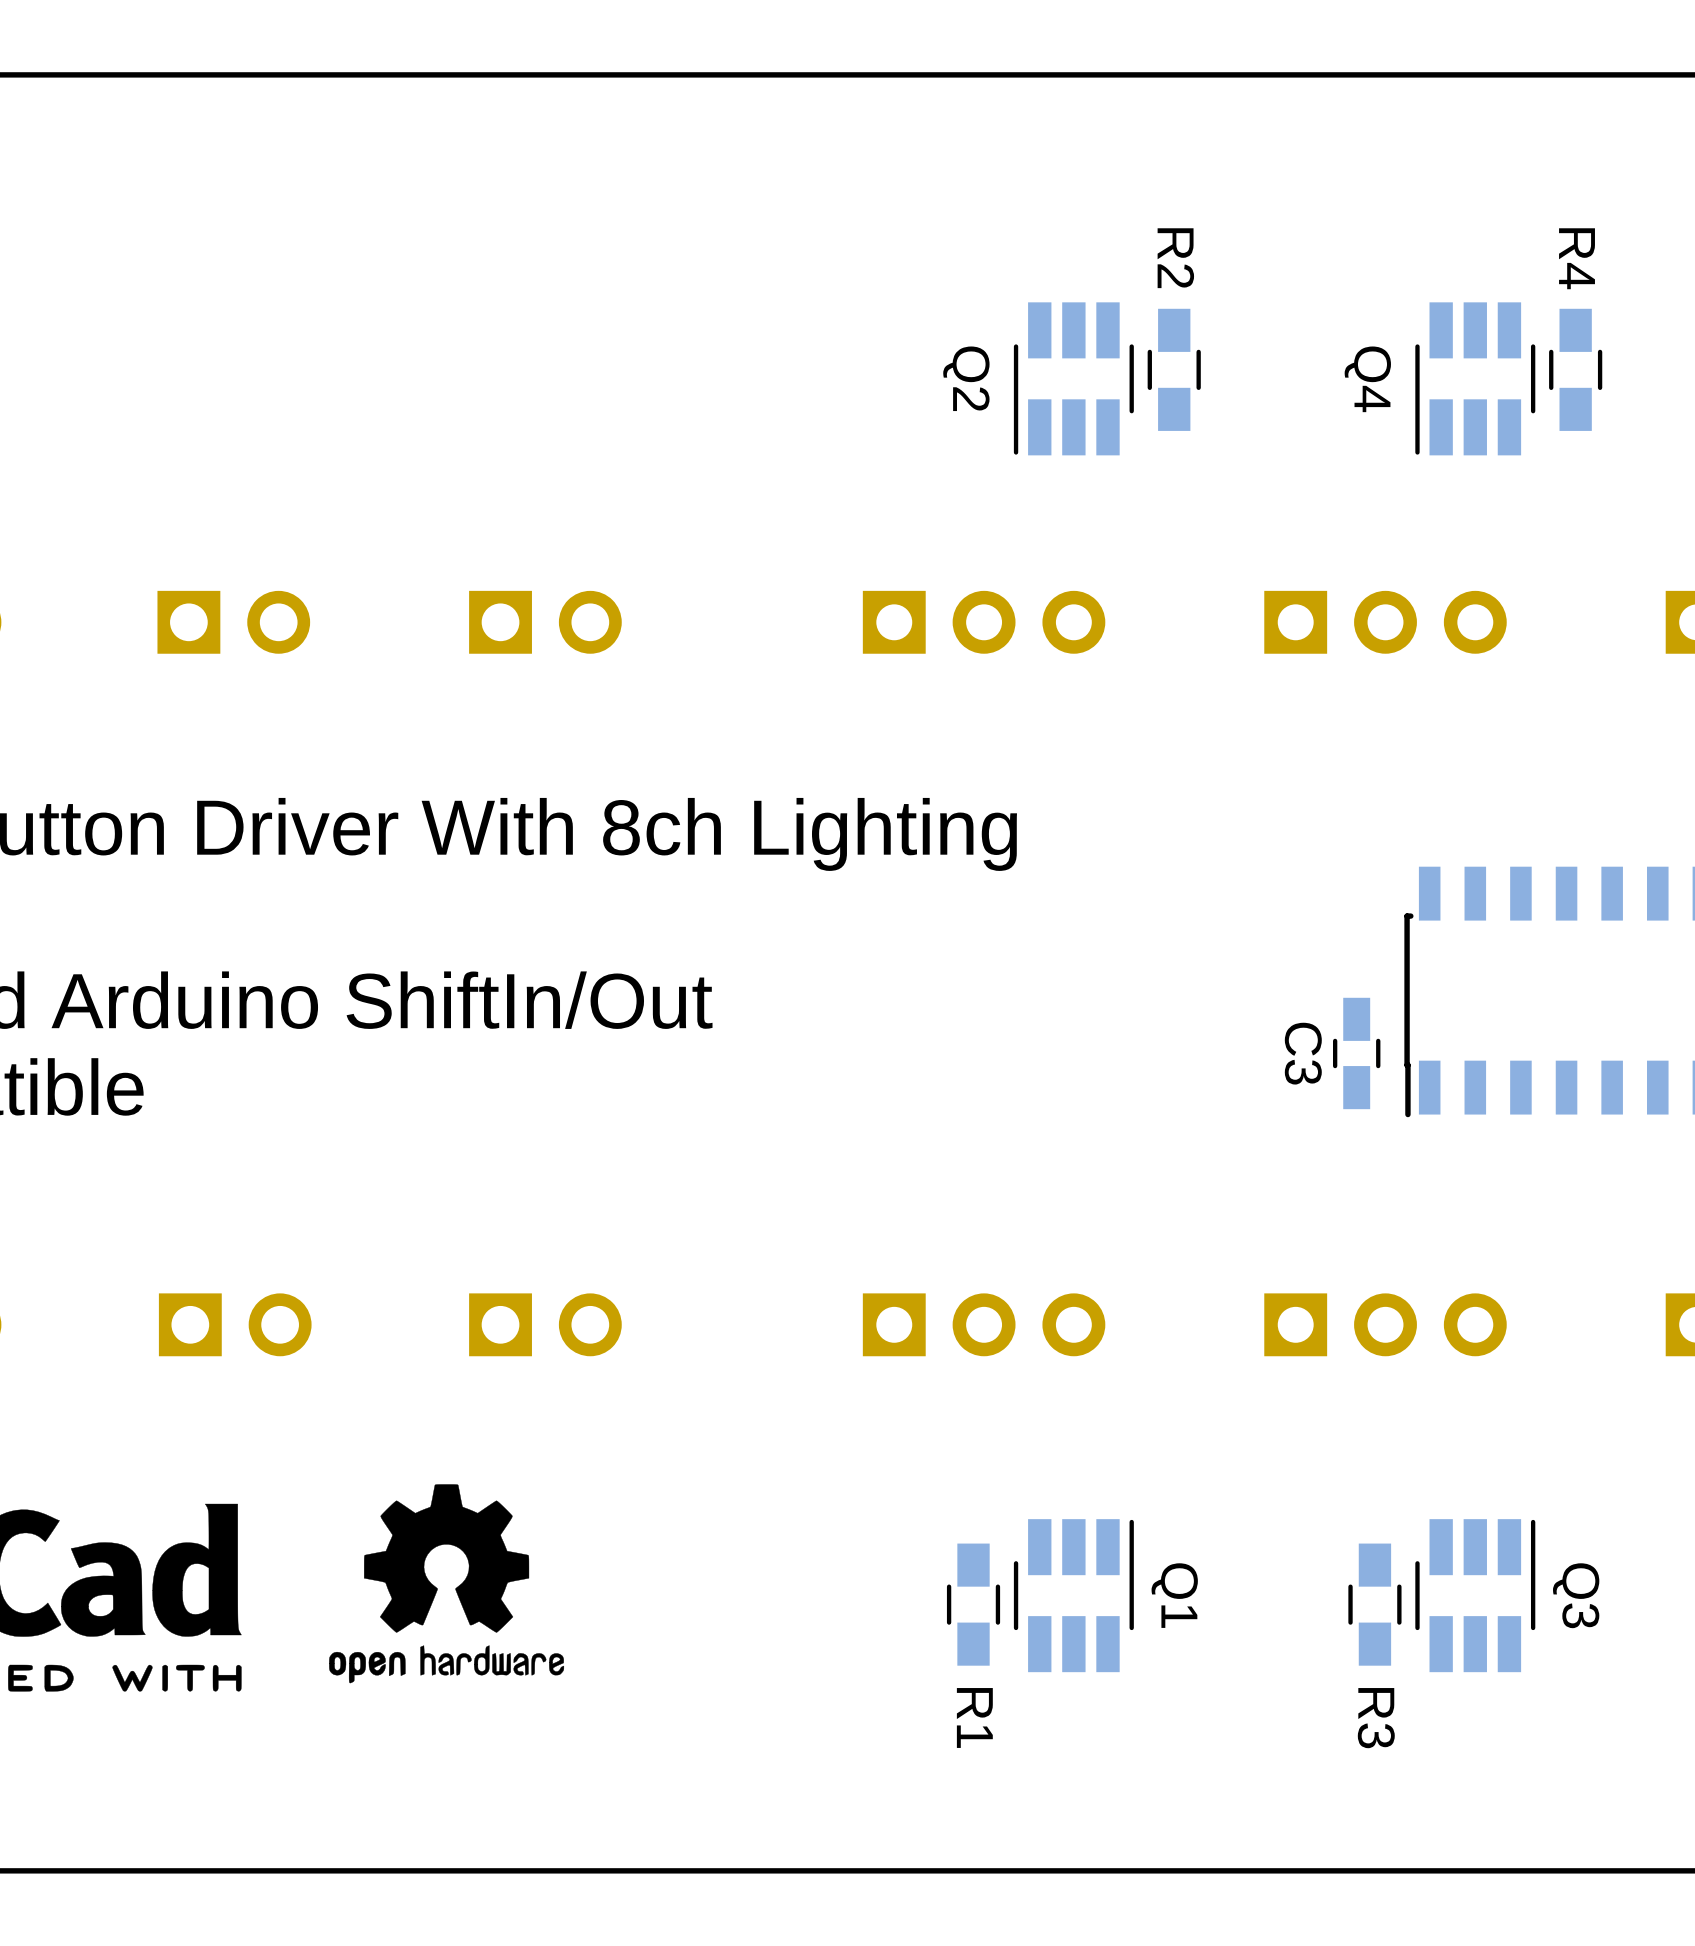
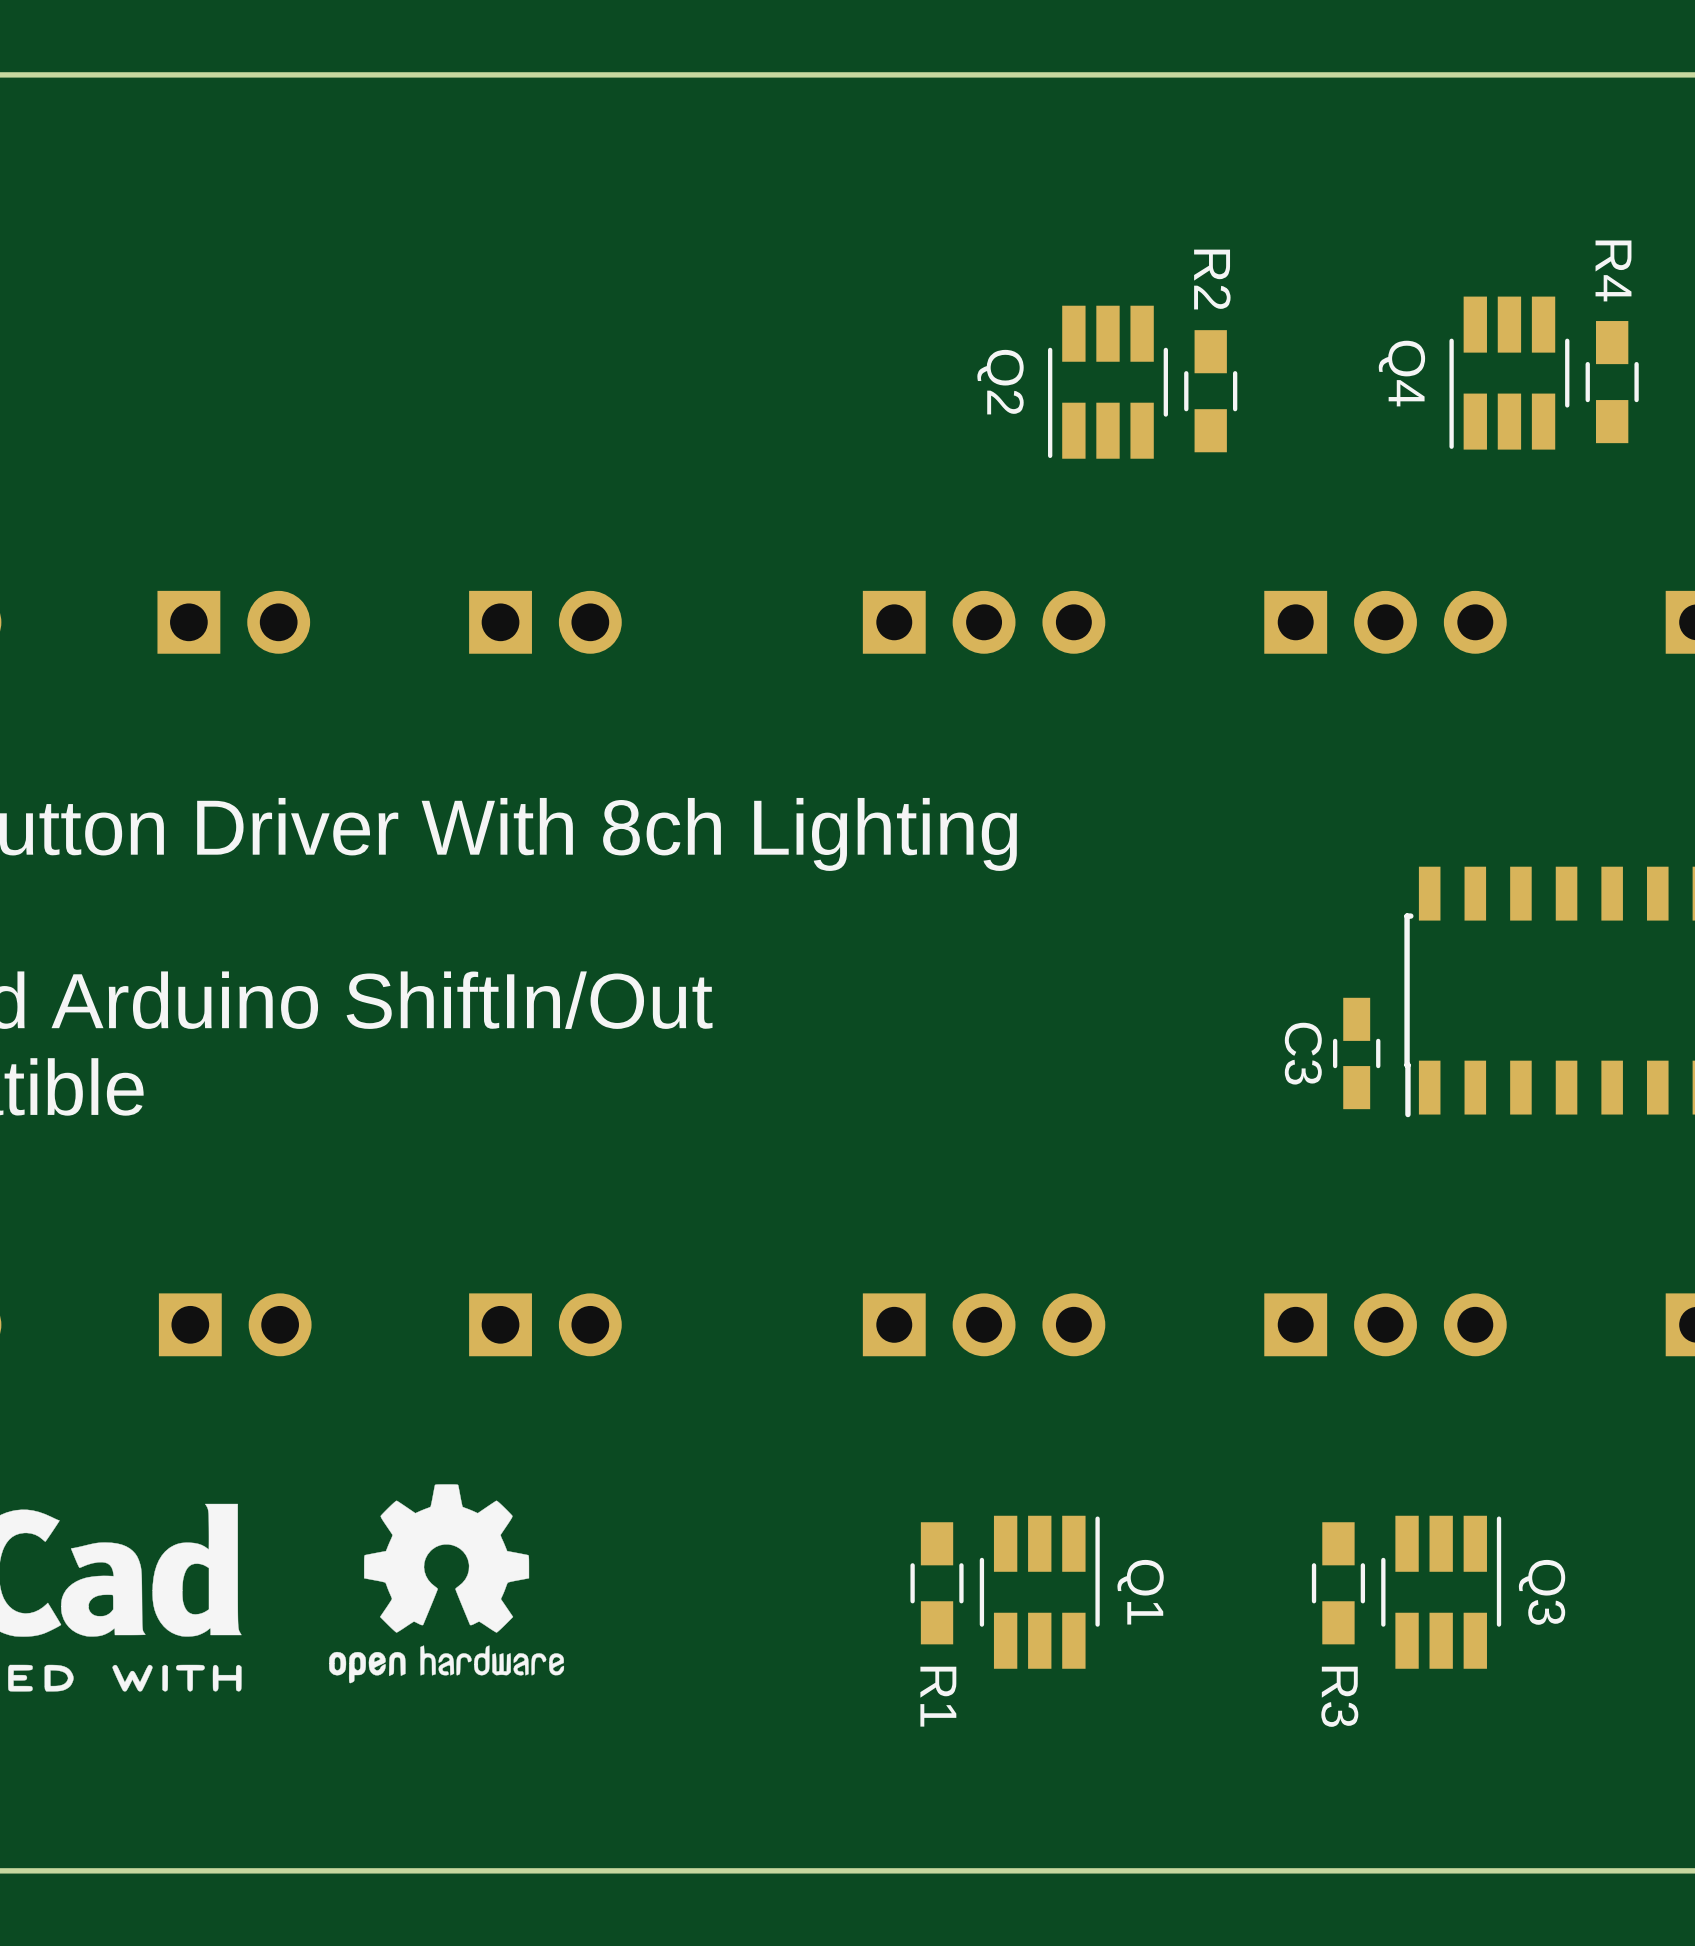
R2 position: (1174, 369) -> (1210, 391)
R4 position: (1575, 369) -> (1612, 382)
Q2 position: (1073, 378) -> (1107, 382)
Q4 position: (1475, 378) -> (1509, 373)
Q1 position: (1073, 1595) -> (1039, 1592)
Q3 position: (1475, 1595) -> (1441, 1592)
R1 position: (973, 1604) -> (937, 1583)
R3 position: (1374, 1604) -> (1338, 1583)

